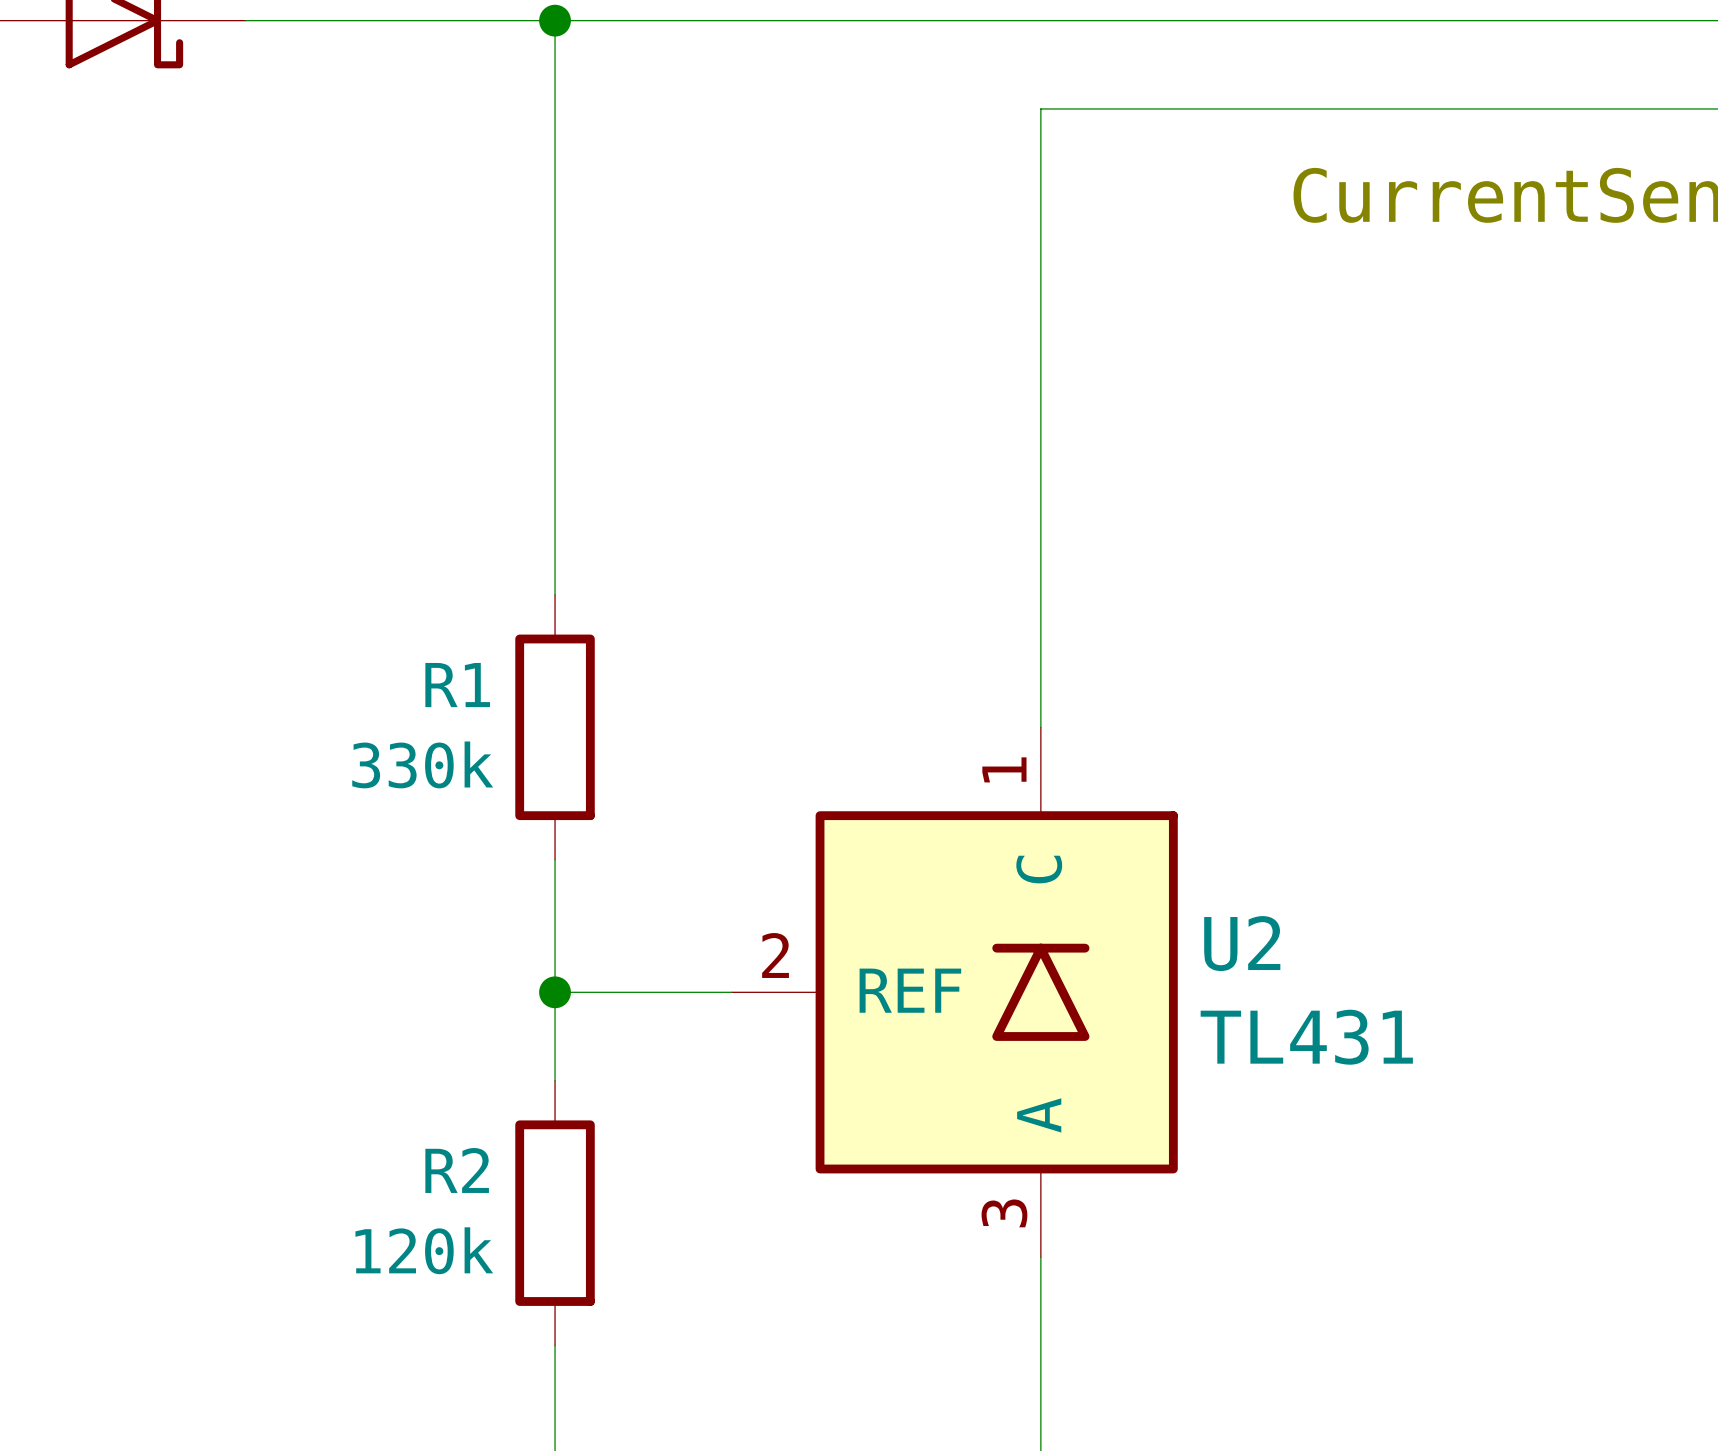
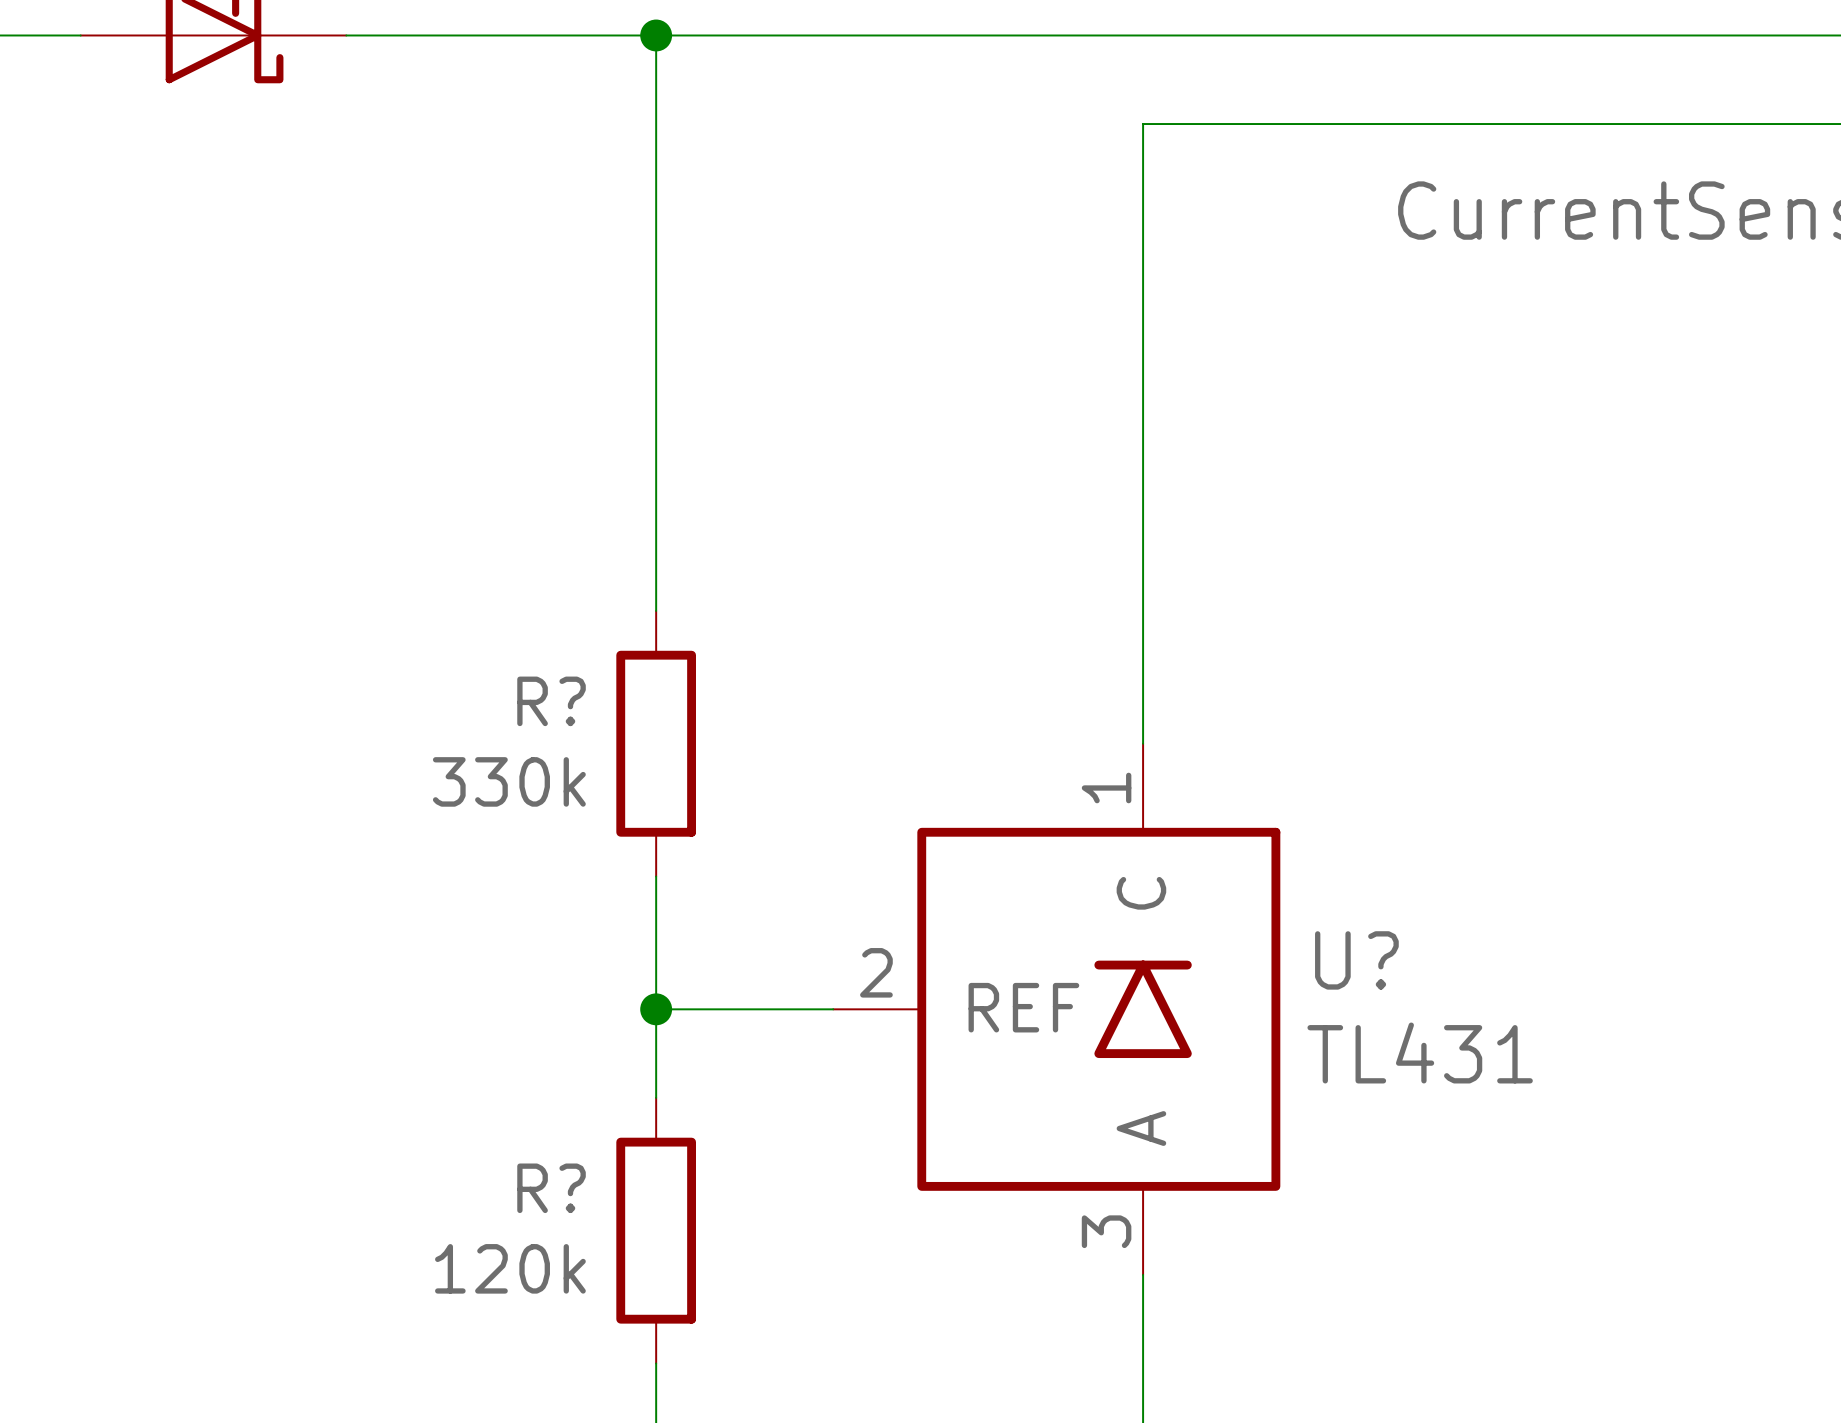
R1 name: R1 (457, 685) -> R? (551, 701)
U2 name: U2 (1242, 943) -> U? (1356, 960)
R2 name: R2 (457, 1170) -> R? (551, 1188)

